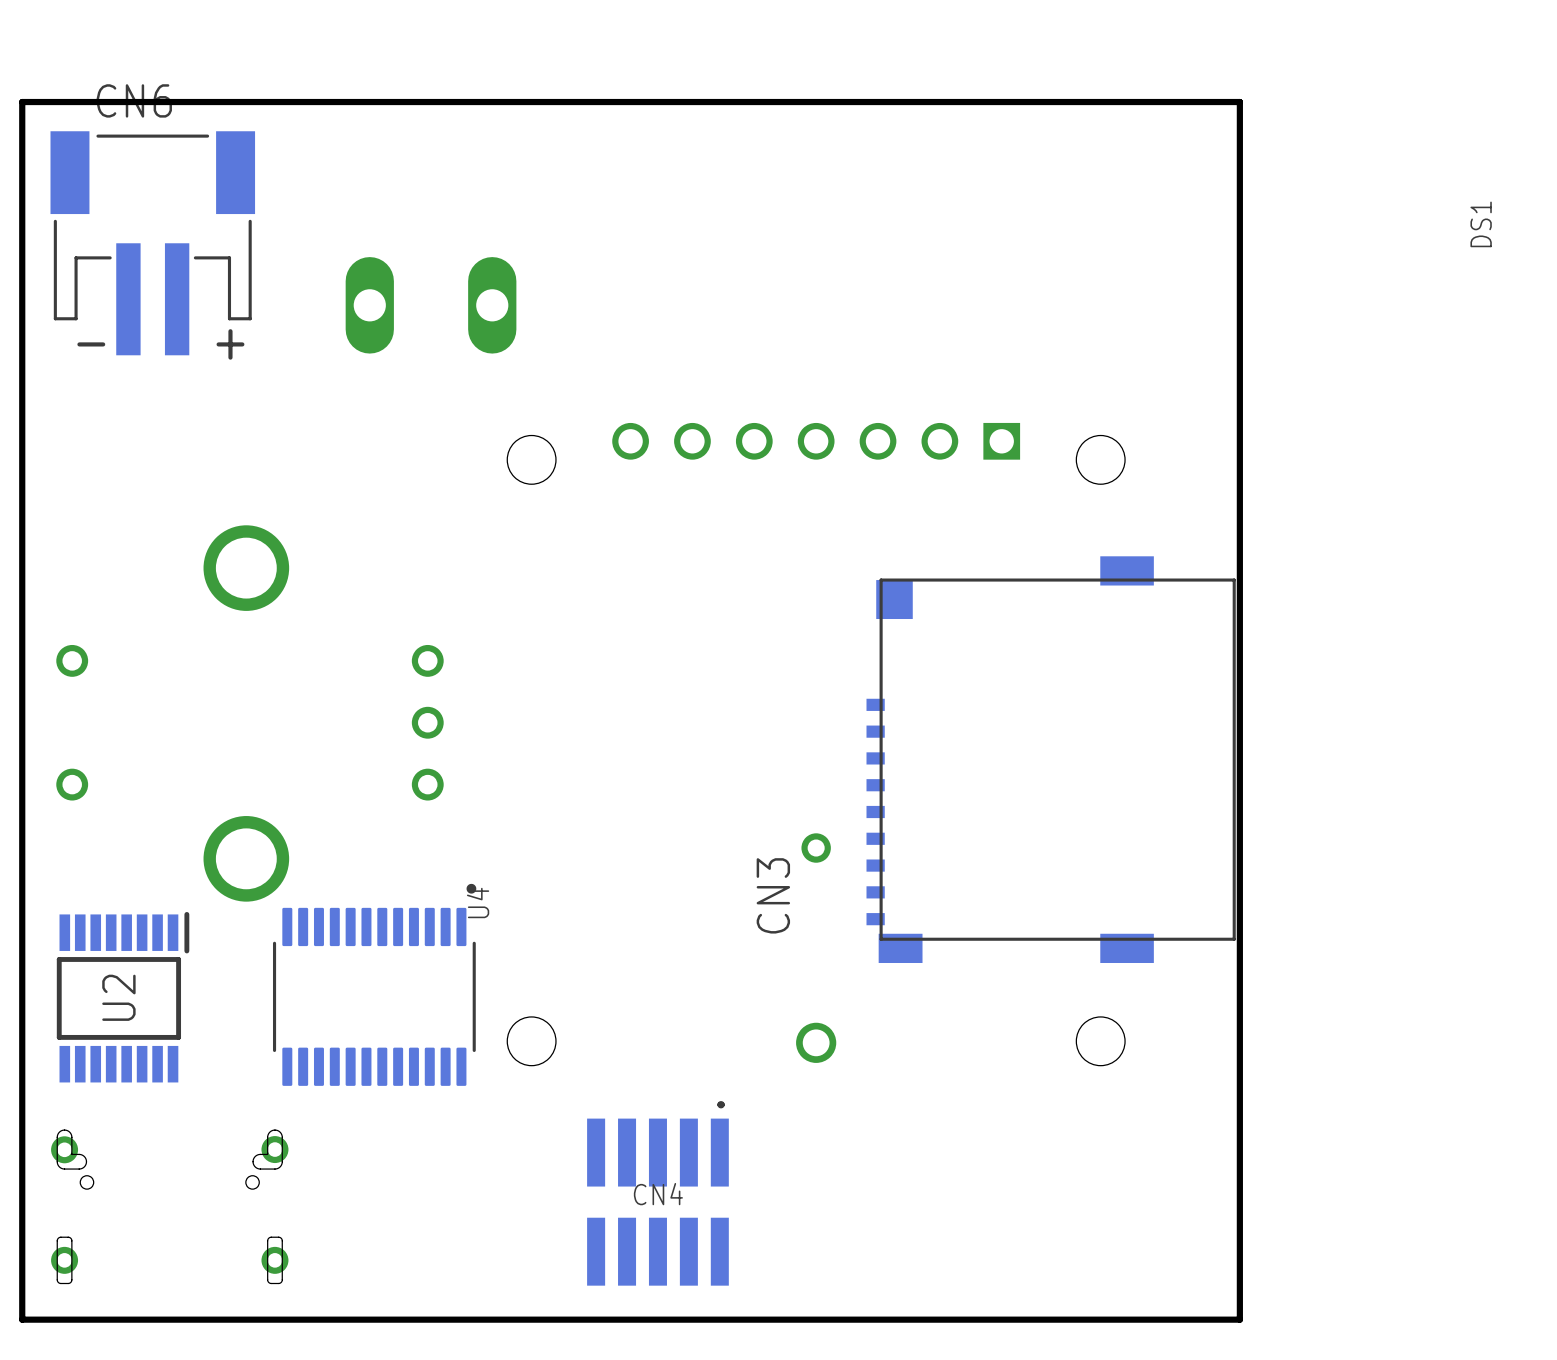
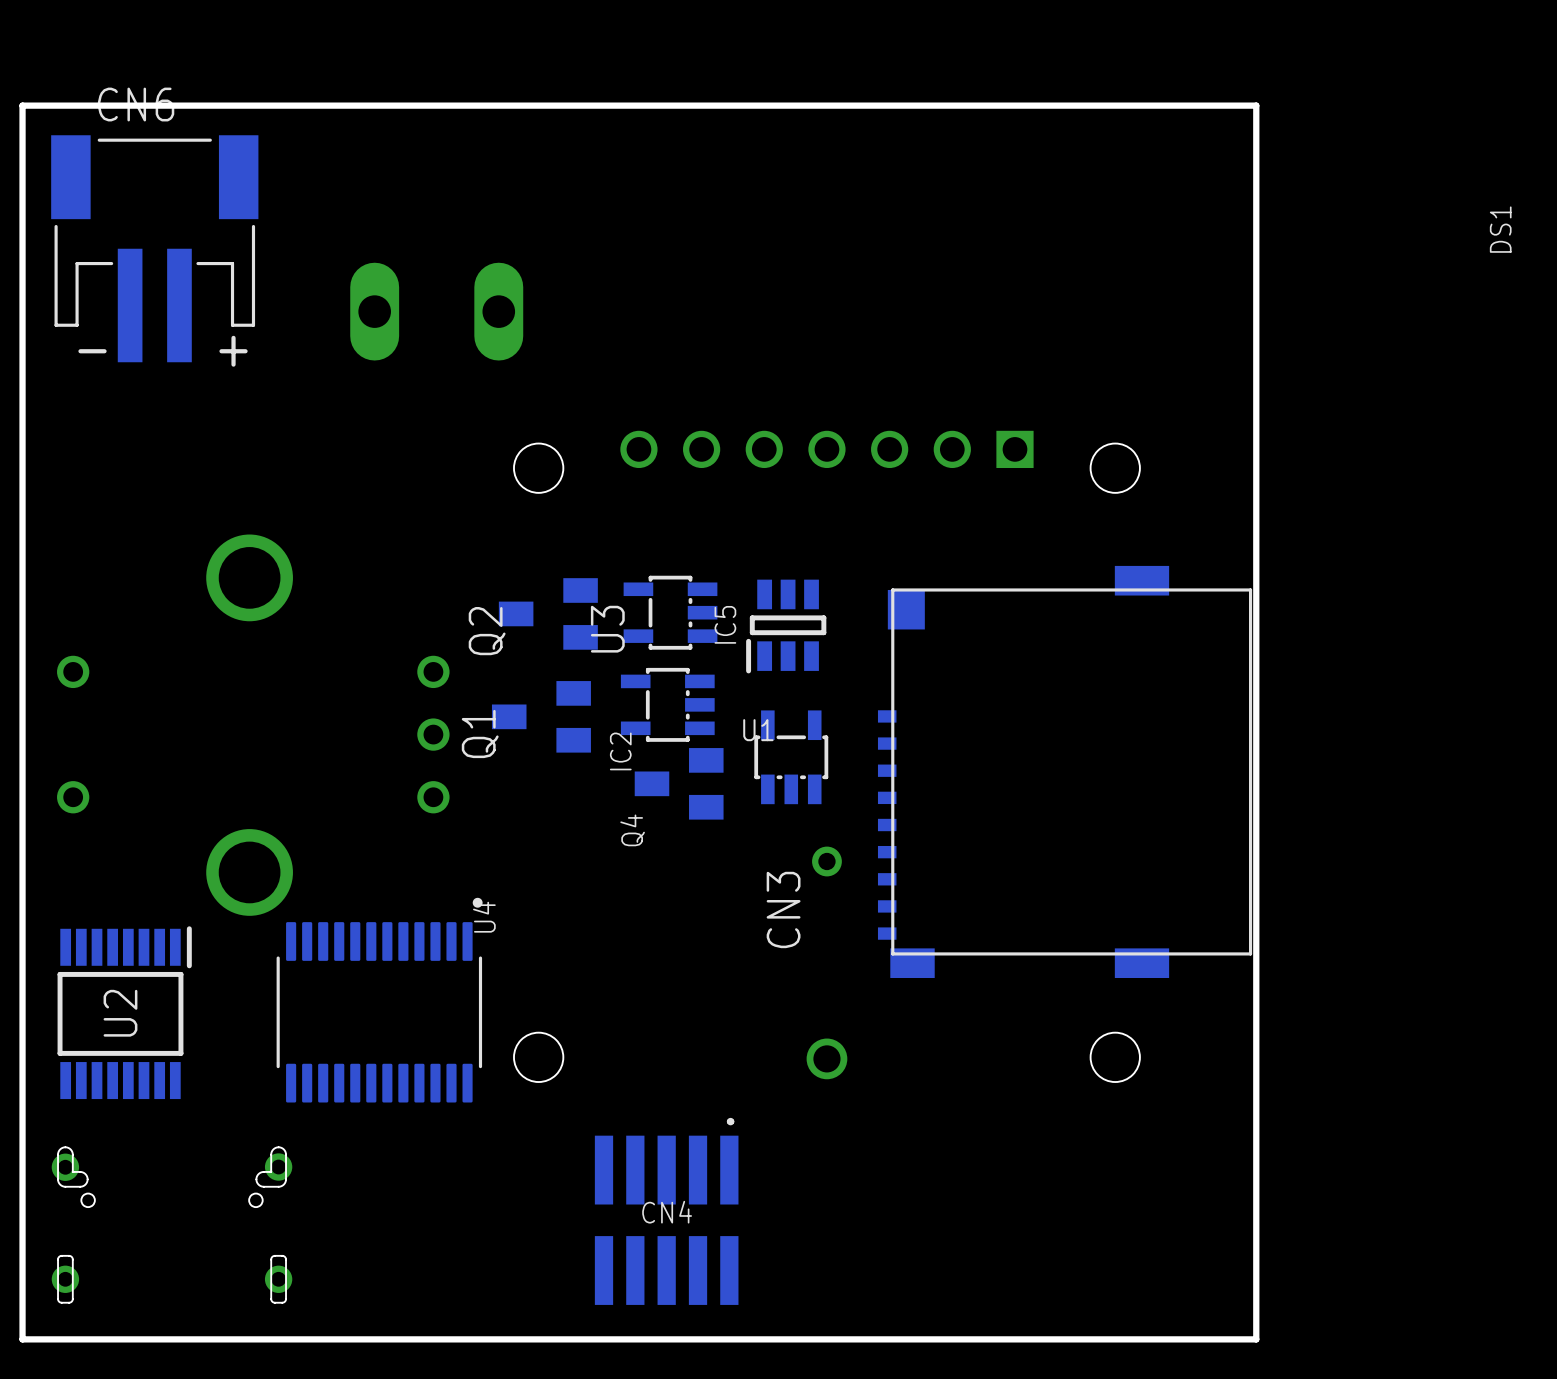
U3: none -> (670, 612)
Q2: none -> (548, 613)
IC5: none -> (786, 626)
IC2: none -> (667, 704)
Q1: none -> (541, 716)
U1: none -> (791, 757)
Q4: none -> (679, 783)

